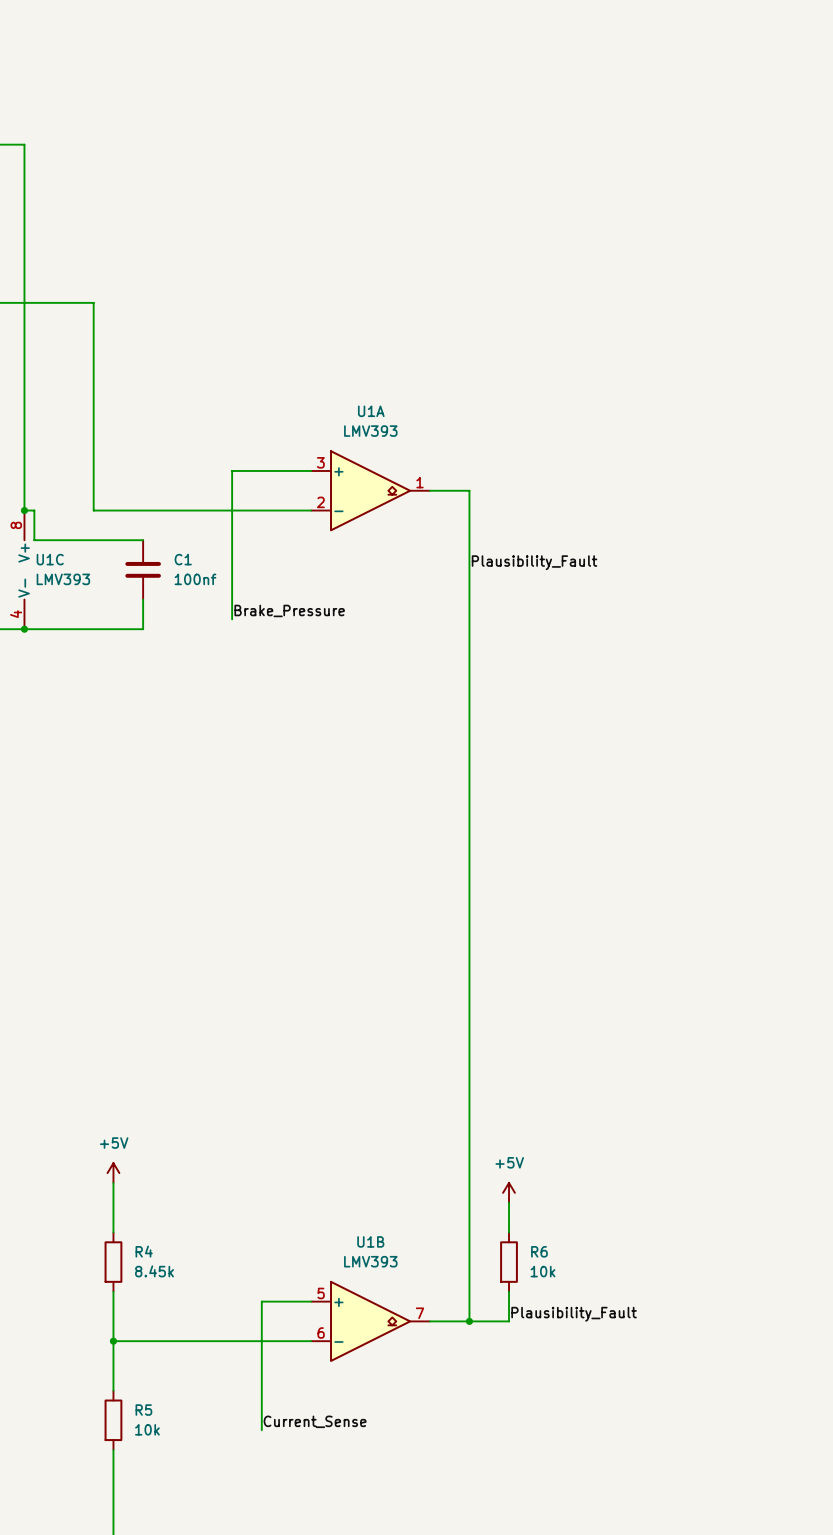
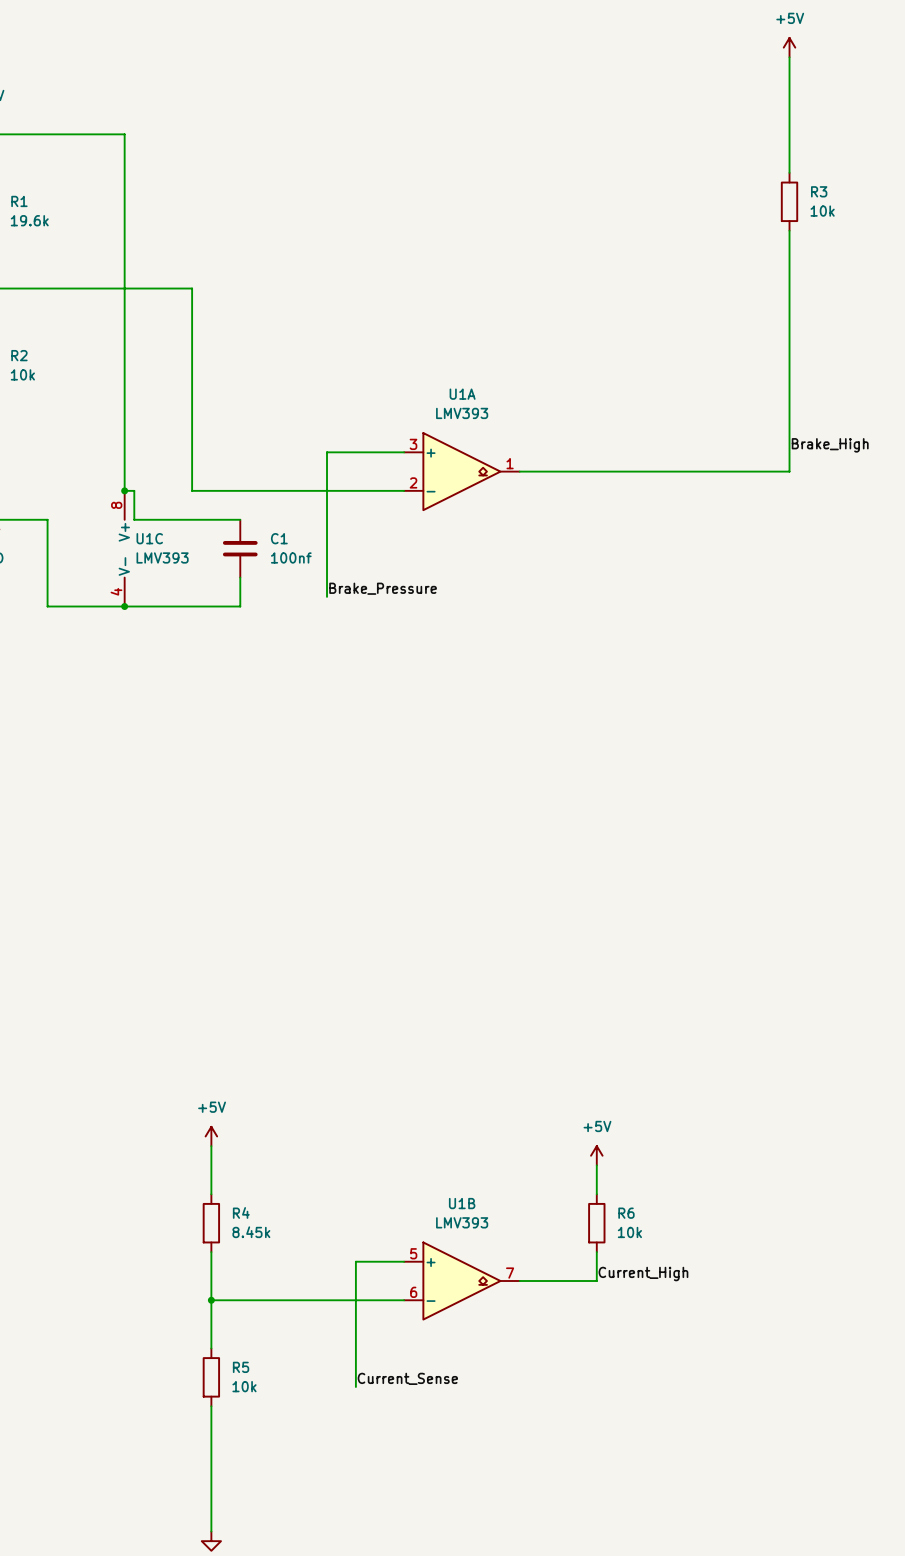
power symbol: none -> +5V (789, 47)
wire: none -> (789, 57) (789, 172)
R3: none -> 10k (789, 201)
label: none -> Brake_High (830, 445)
wire: (469, 490) (469, 1321) -> (558, 471) (789, 471) (789, 230)
label: Plausibility_Fault (534, 562) -> none
label: Plausibility_Fault (574, 1314) -> Current_High (643, 1274)
junction: (469, 1321) -> none

